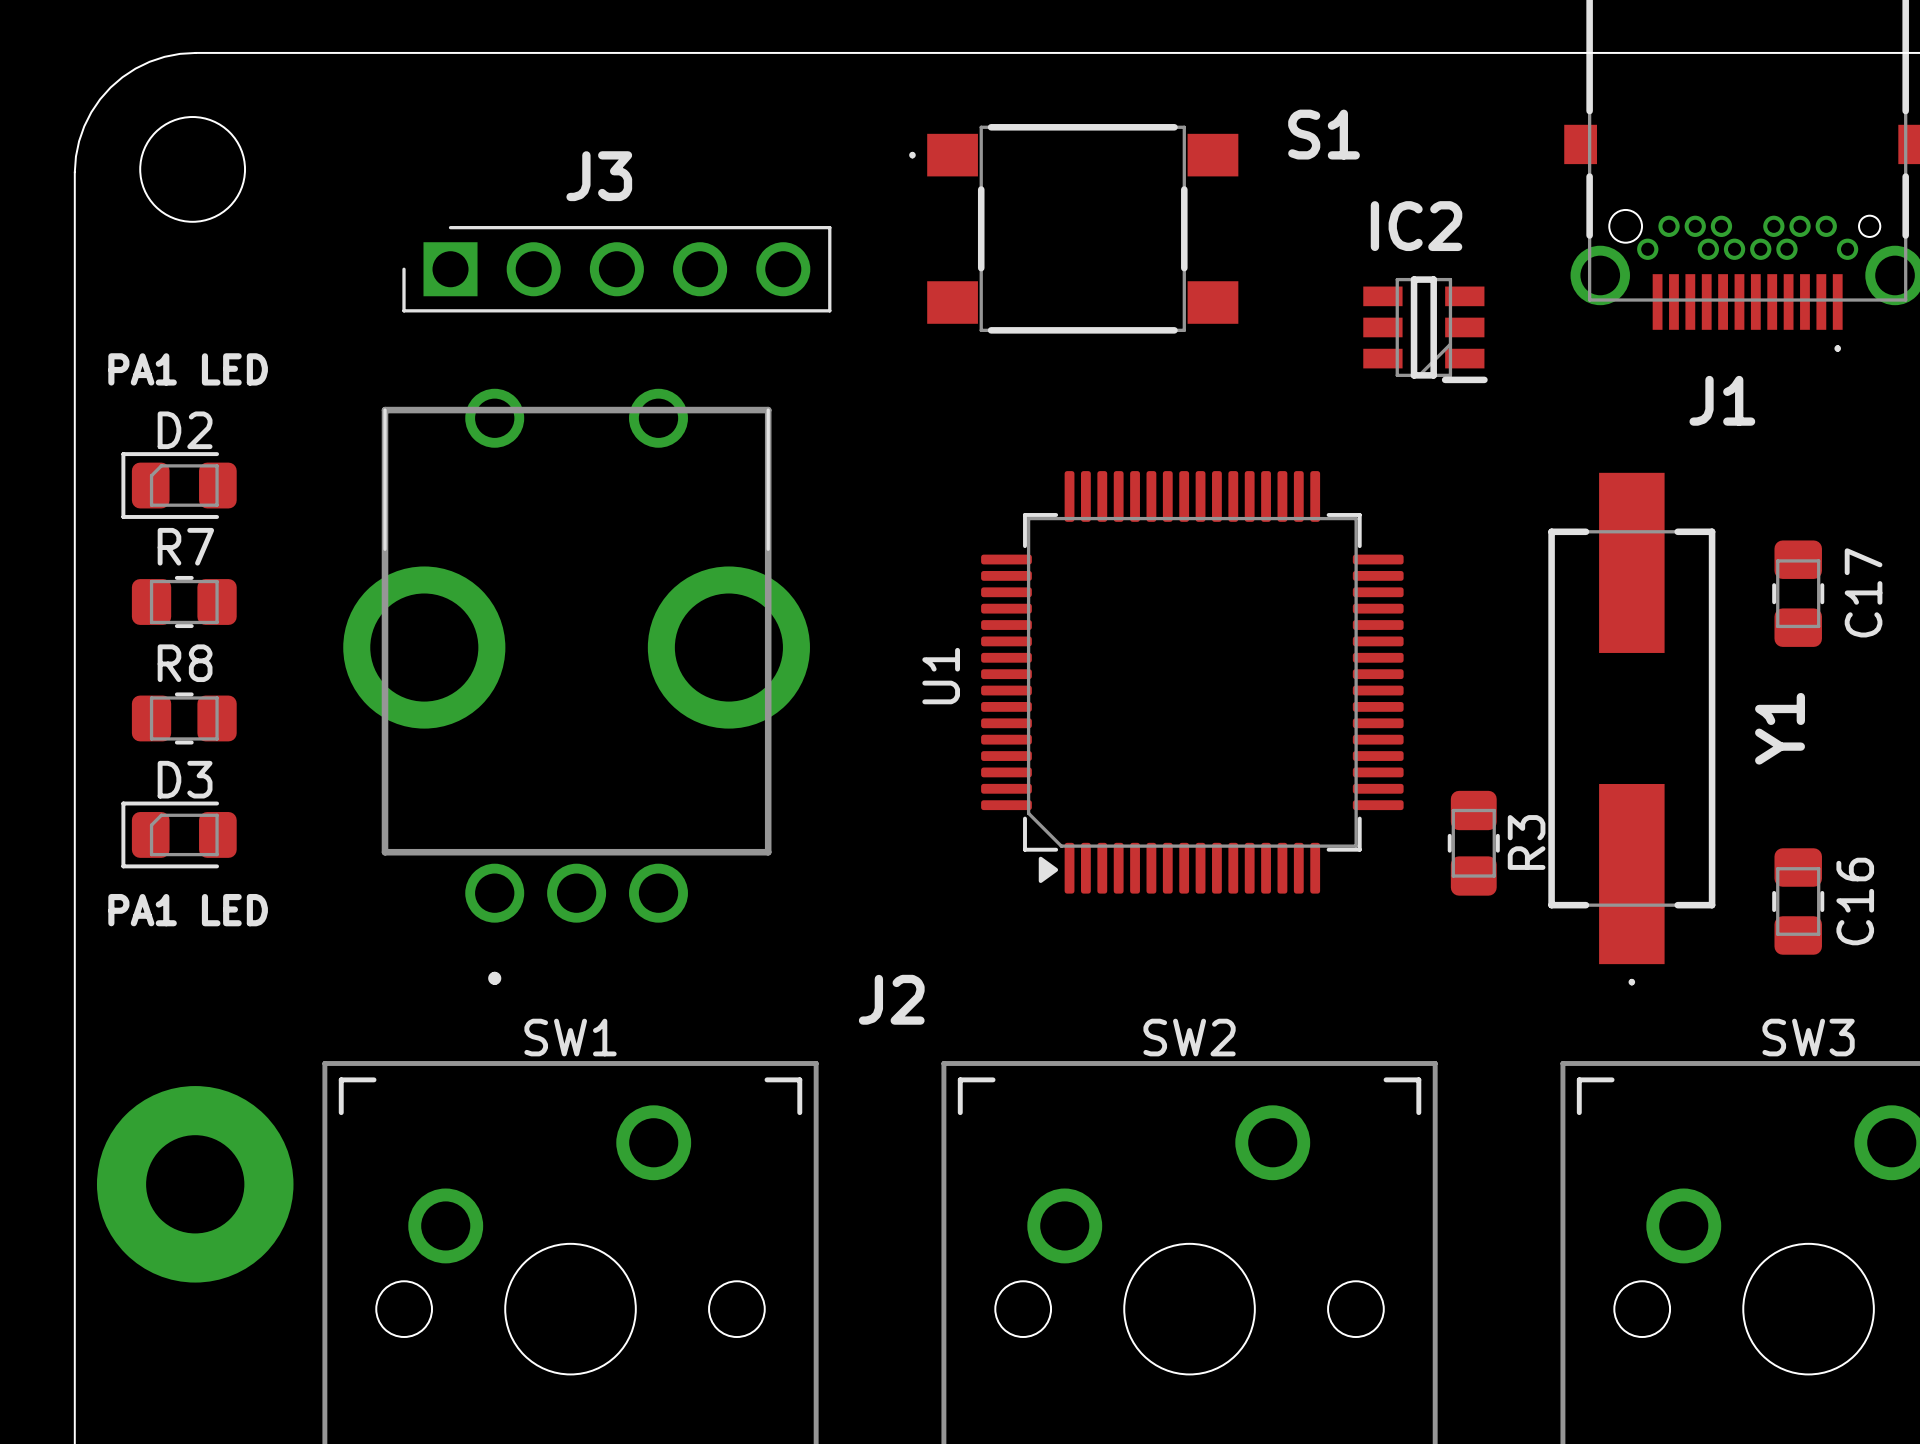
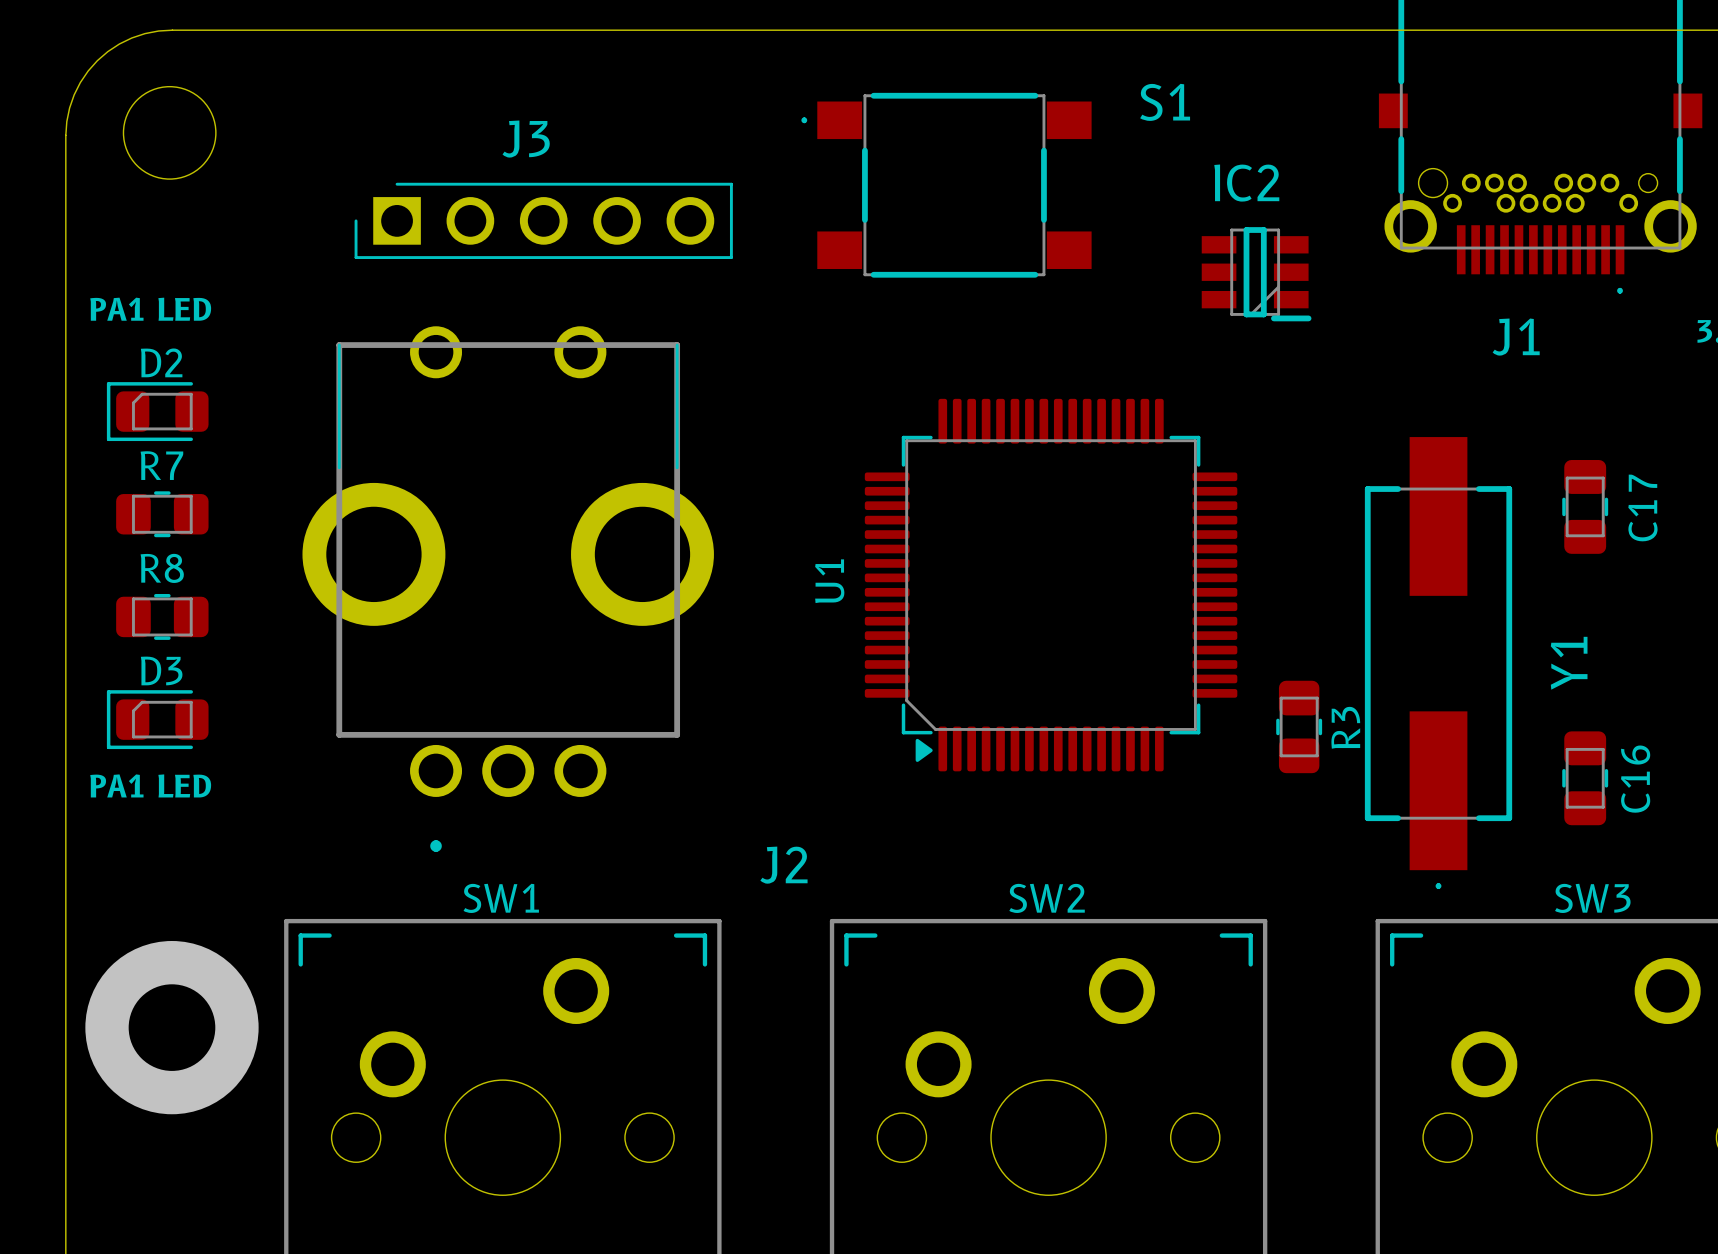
Y1 position: (1631, 729) -> (1438, 662)

